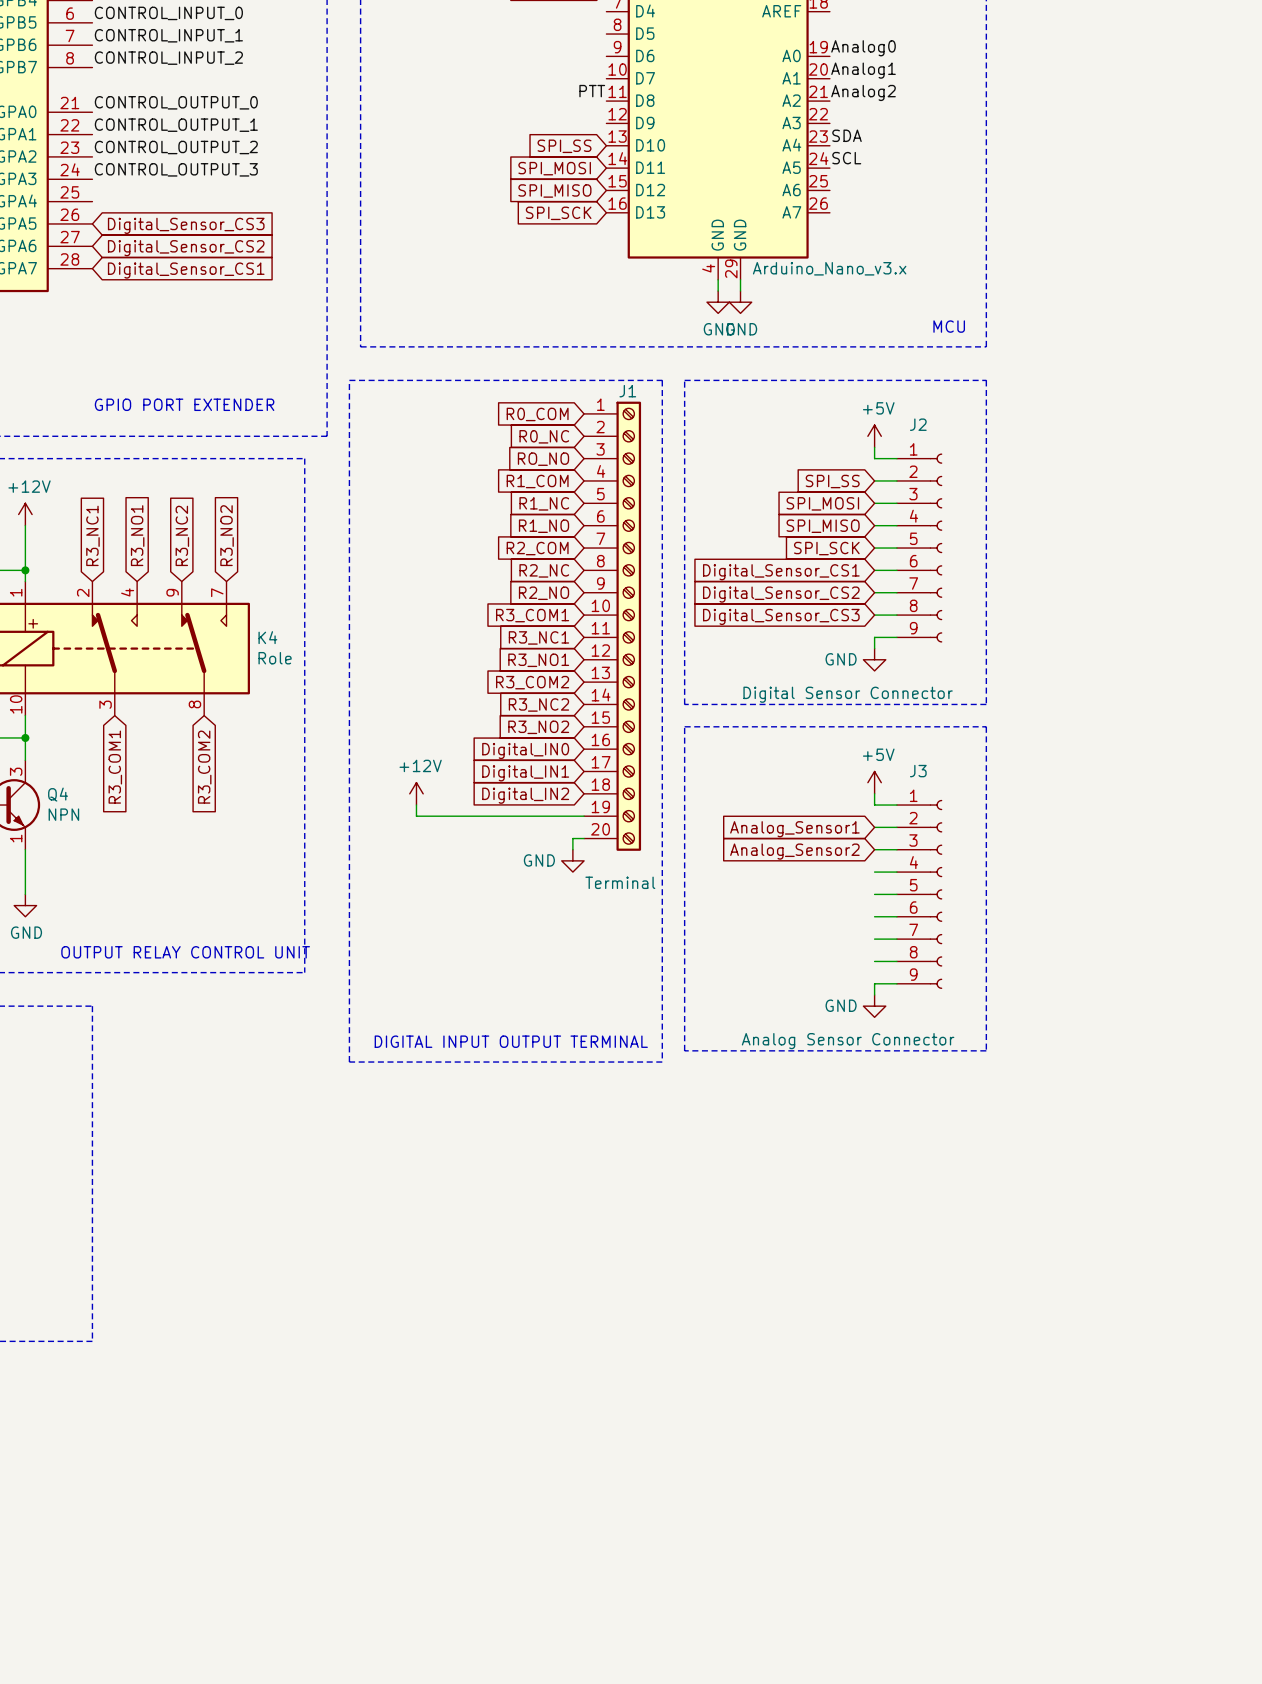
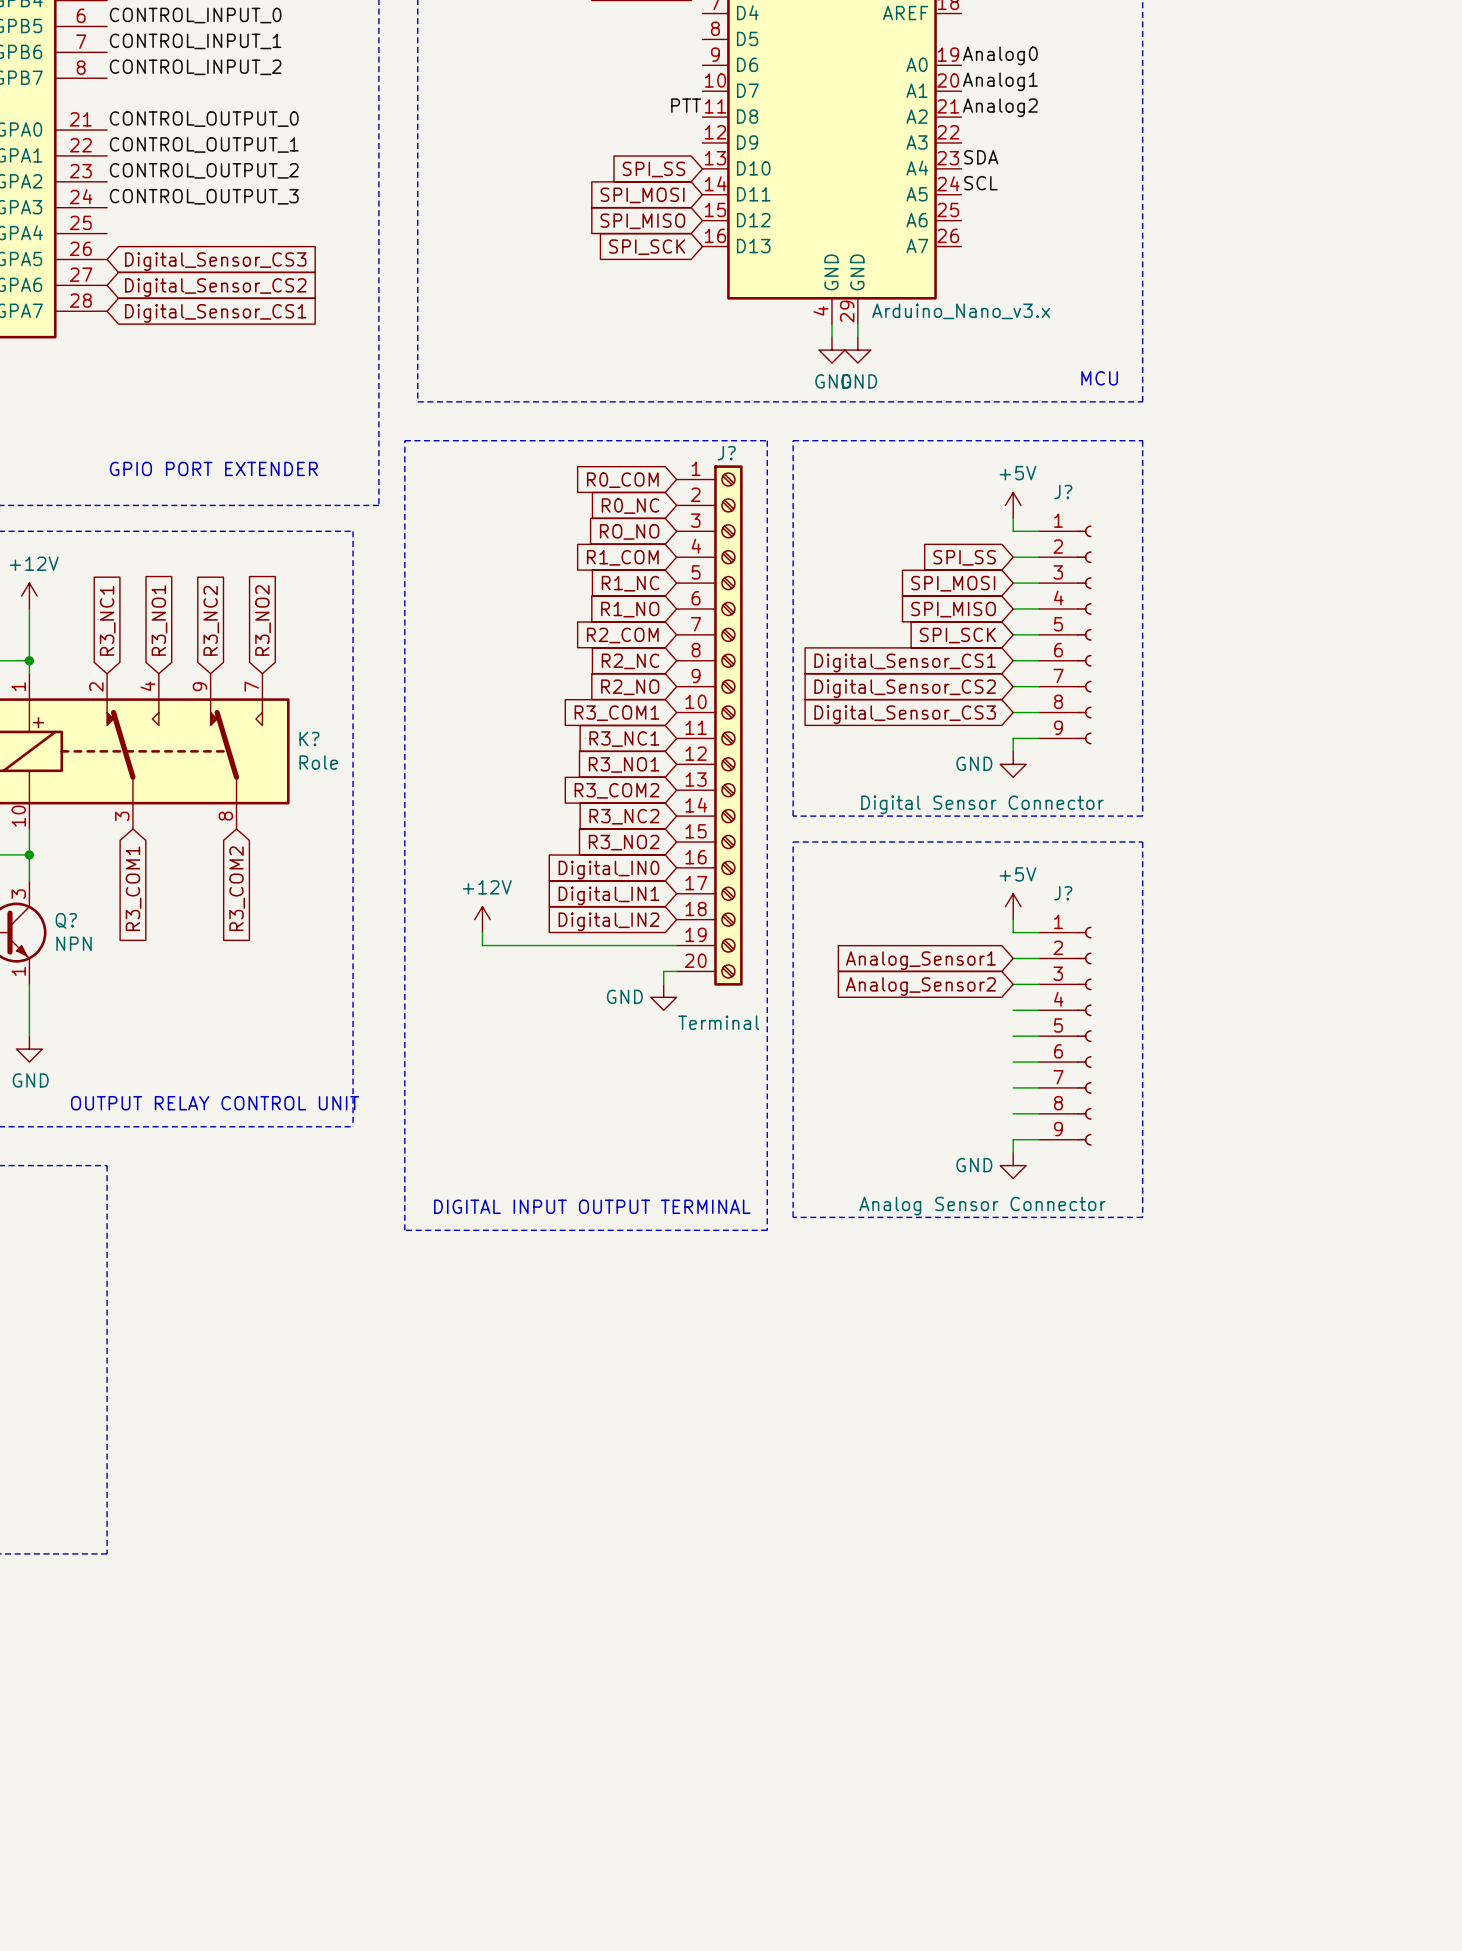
J1 name: J1 (627, 391) -> J? (726, 453)
J2 name: J2 (918, 424) -> J? (1063, 491)
K4 name: K4 (267, 637) -> K? (309, 738)
J3 name: J3 (918, 771) -> J? (1063, 893)
Q4 name: Q4 (58, 794) -> Q? (66, 920)

